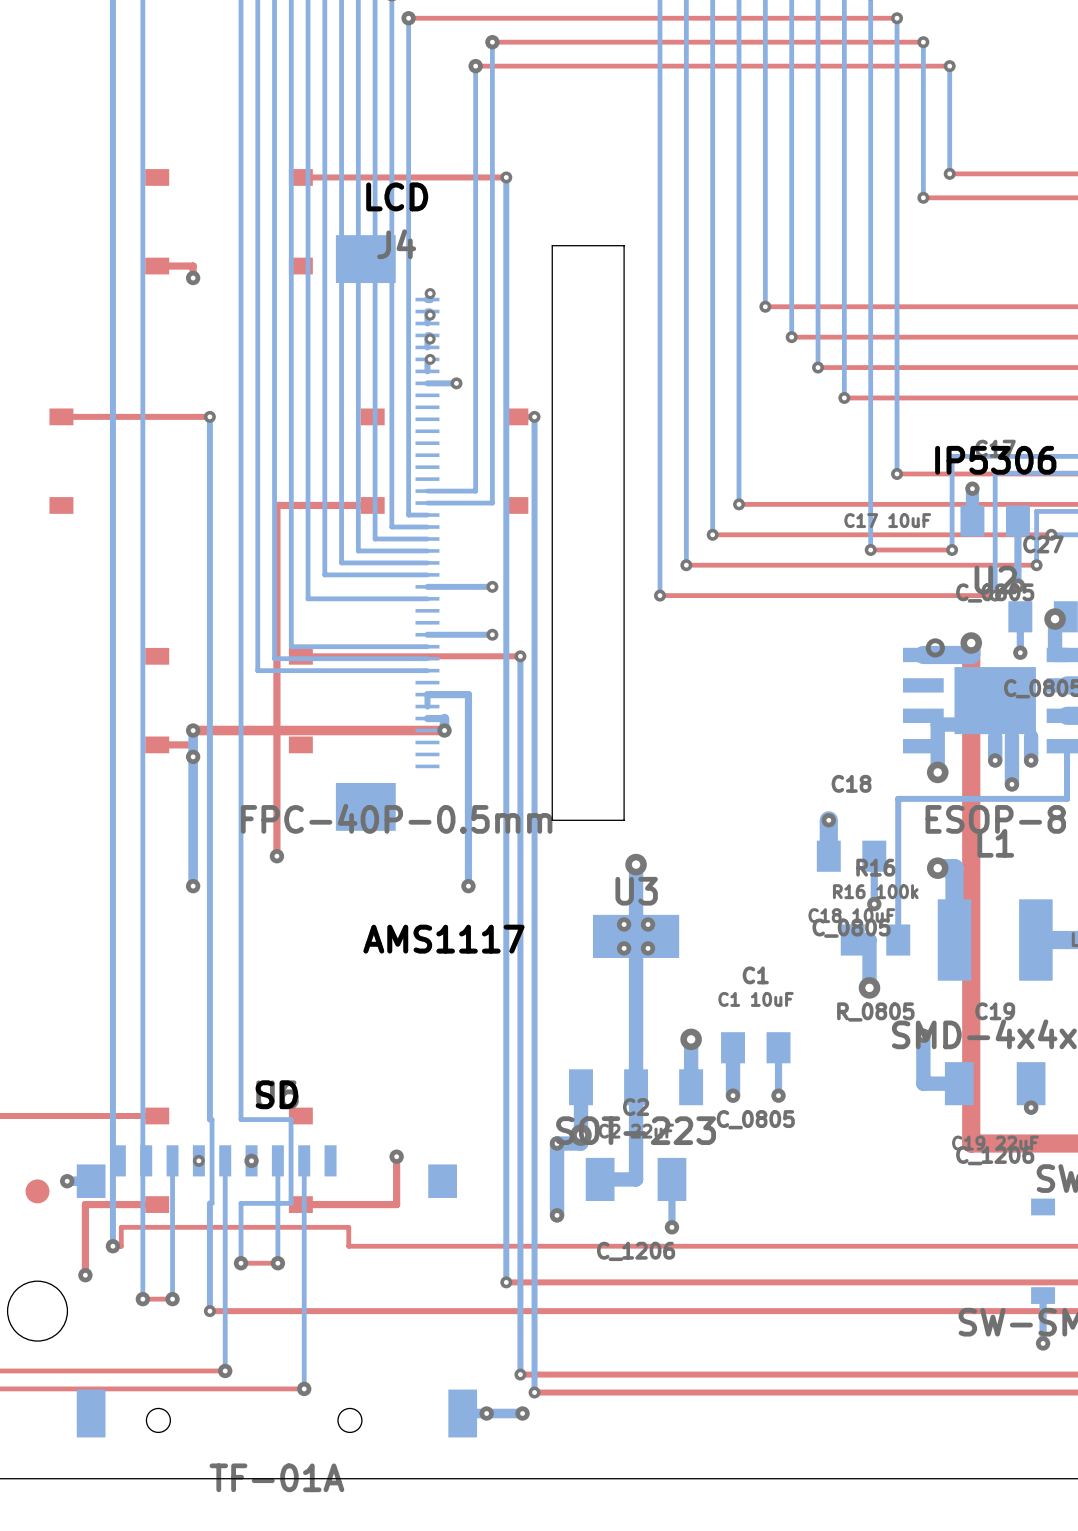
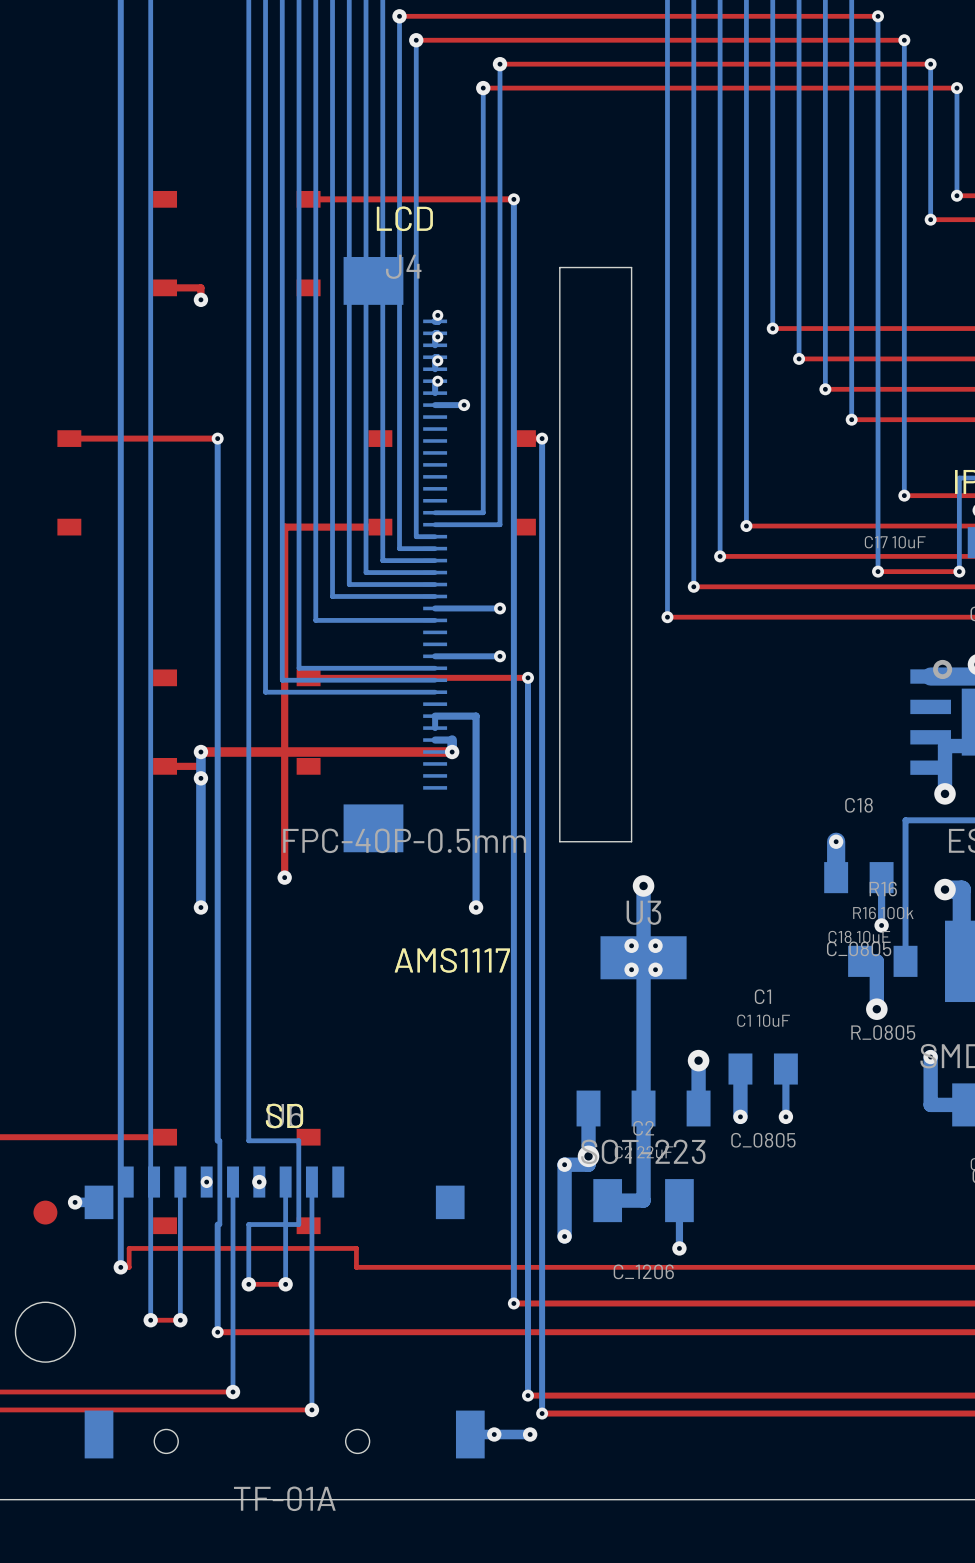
top track: (396, 1156) (396, 1204) (300, 1204) -> none
via: (396, 1156) -> none
top track: (157, 1204) (85, 1204) (85, 1275) -> none
via: (85, 1275) -> none

